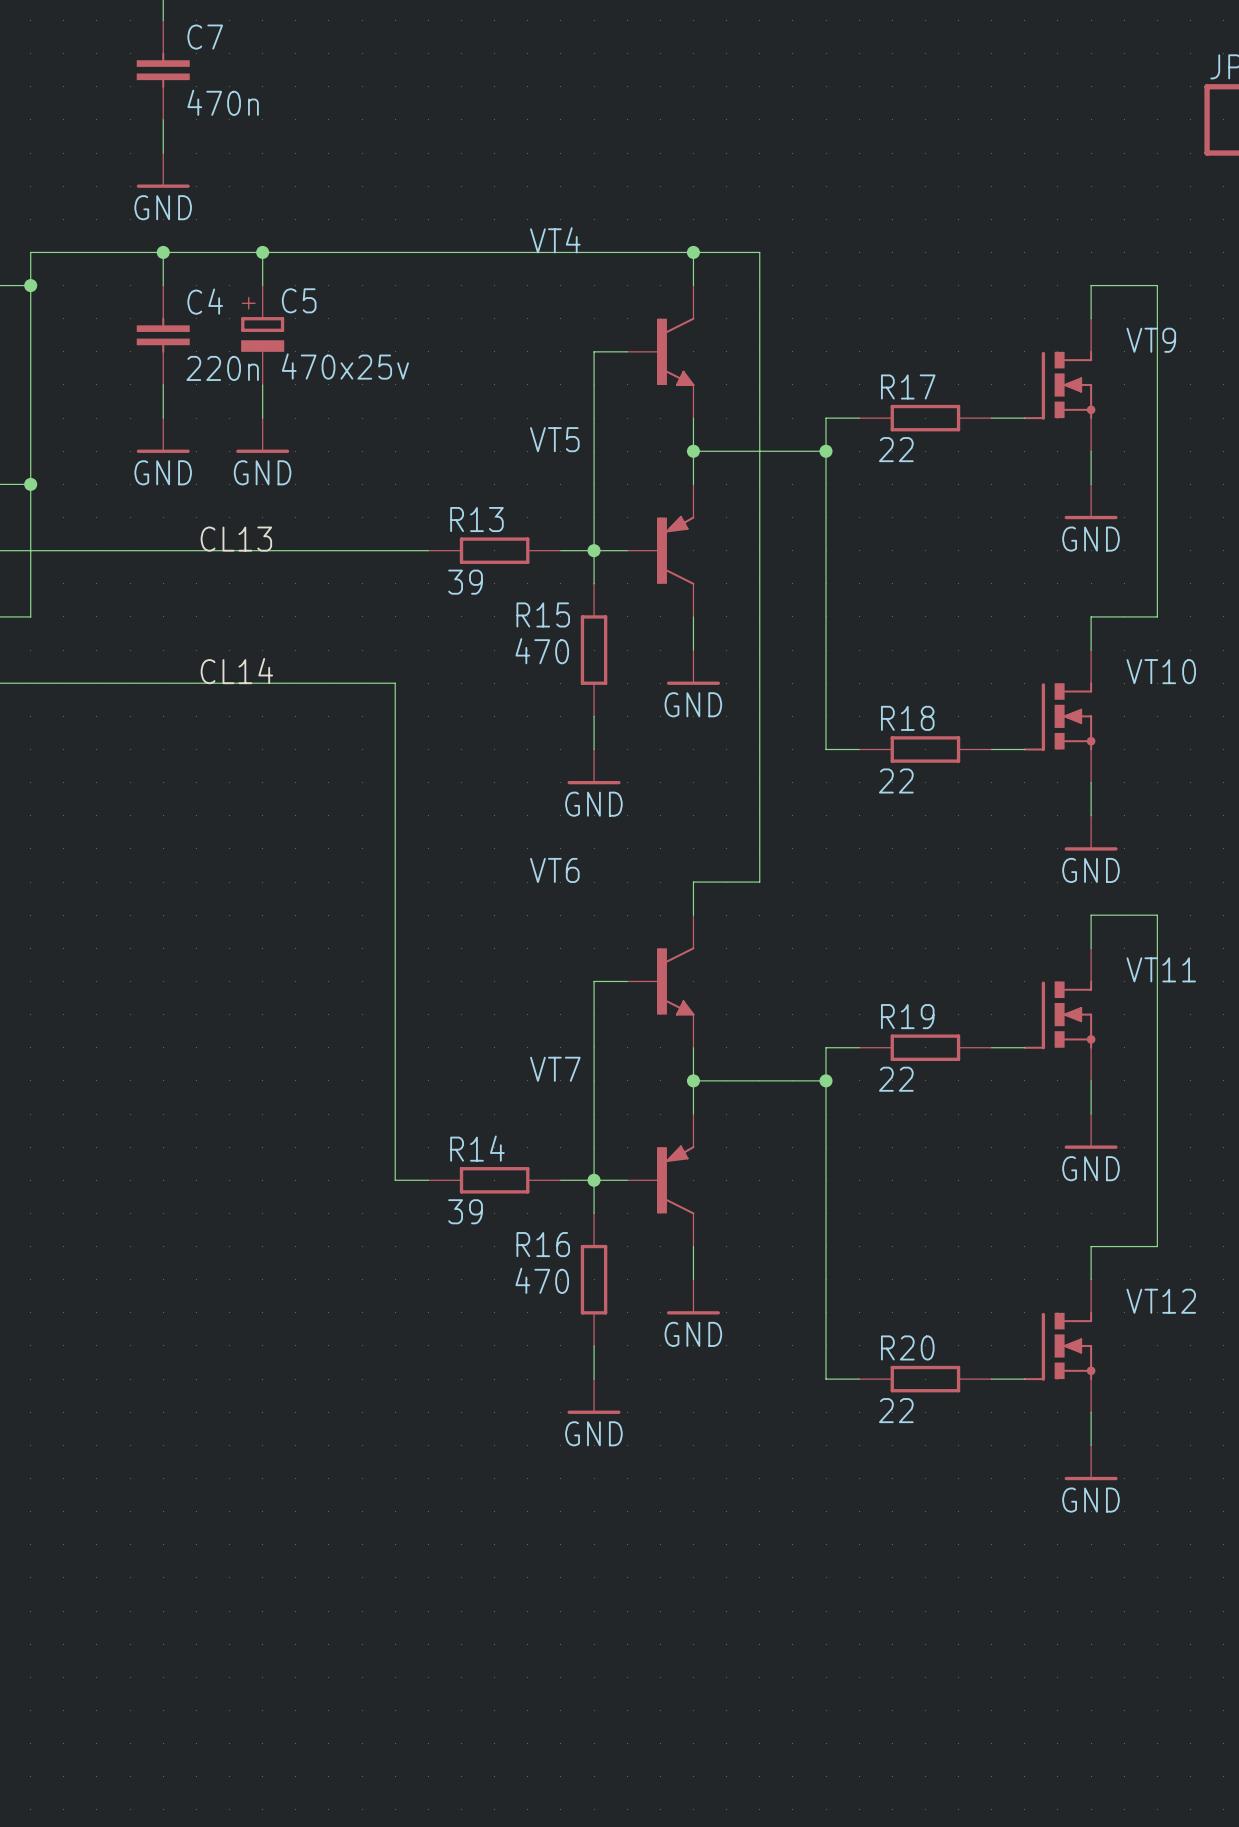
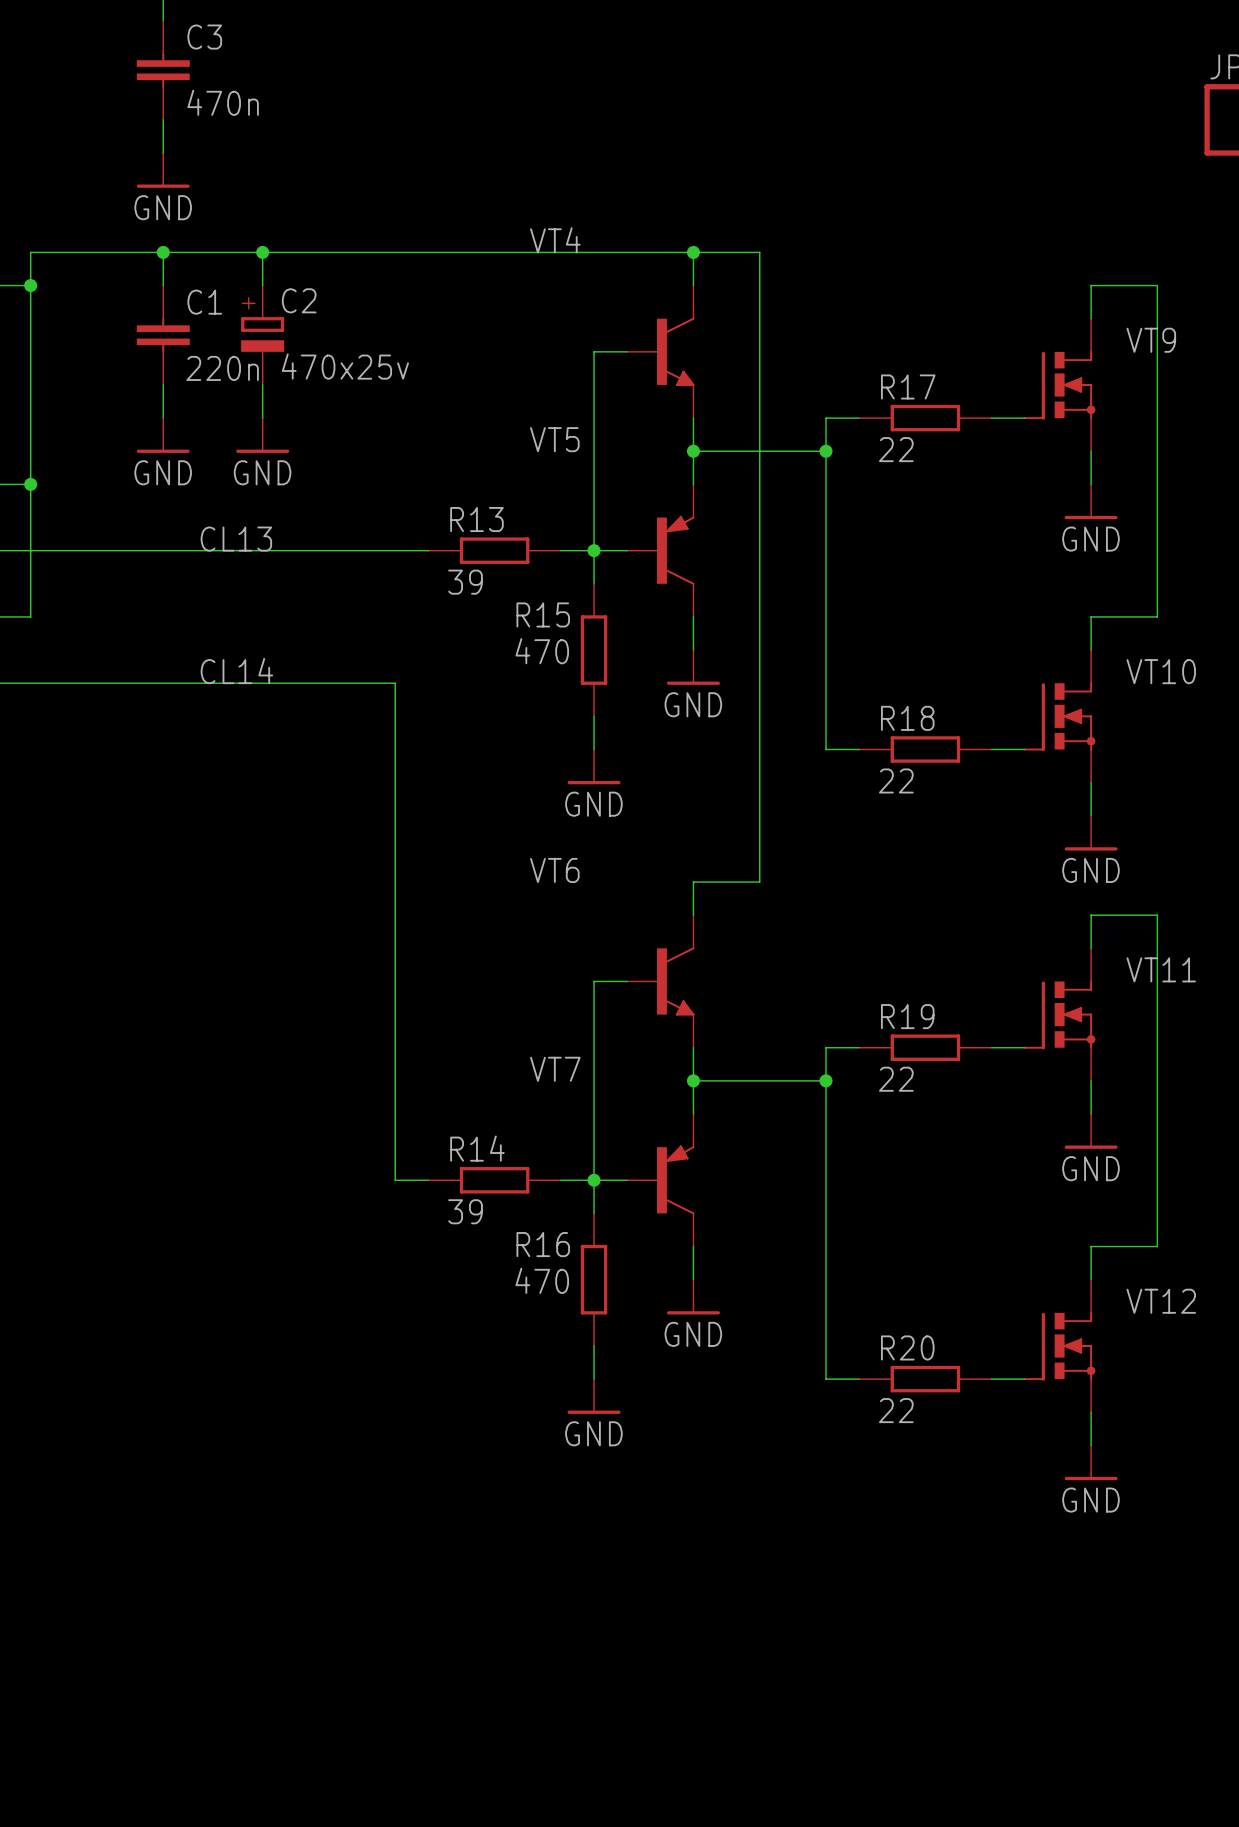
C7 name: C7 (205, 37) -> C3 (204, 37)
C5 name: C5 (299, 300) -> C2 (299, 300)
C4 name: C4 (205, 301) -> C1 (204, 302)

